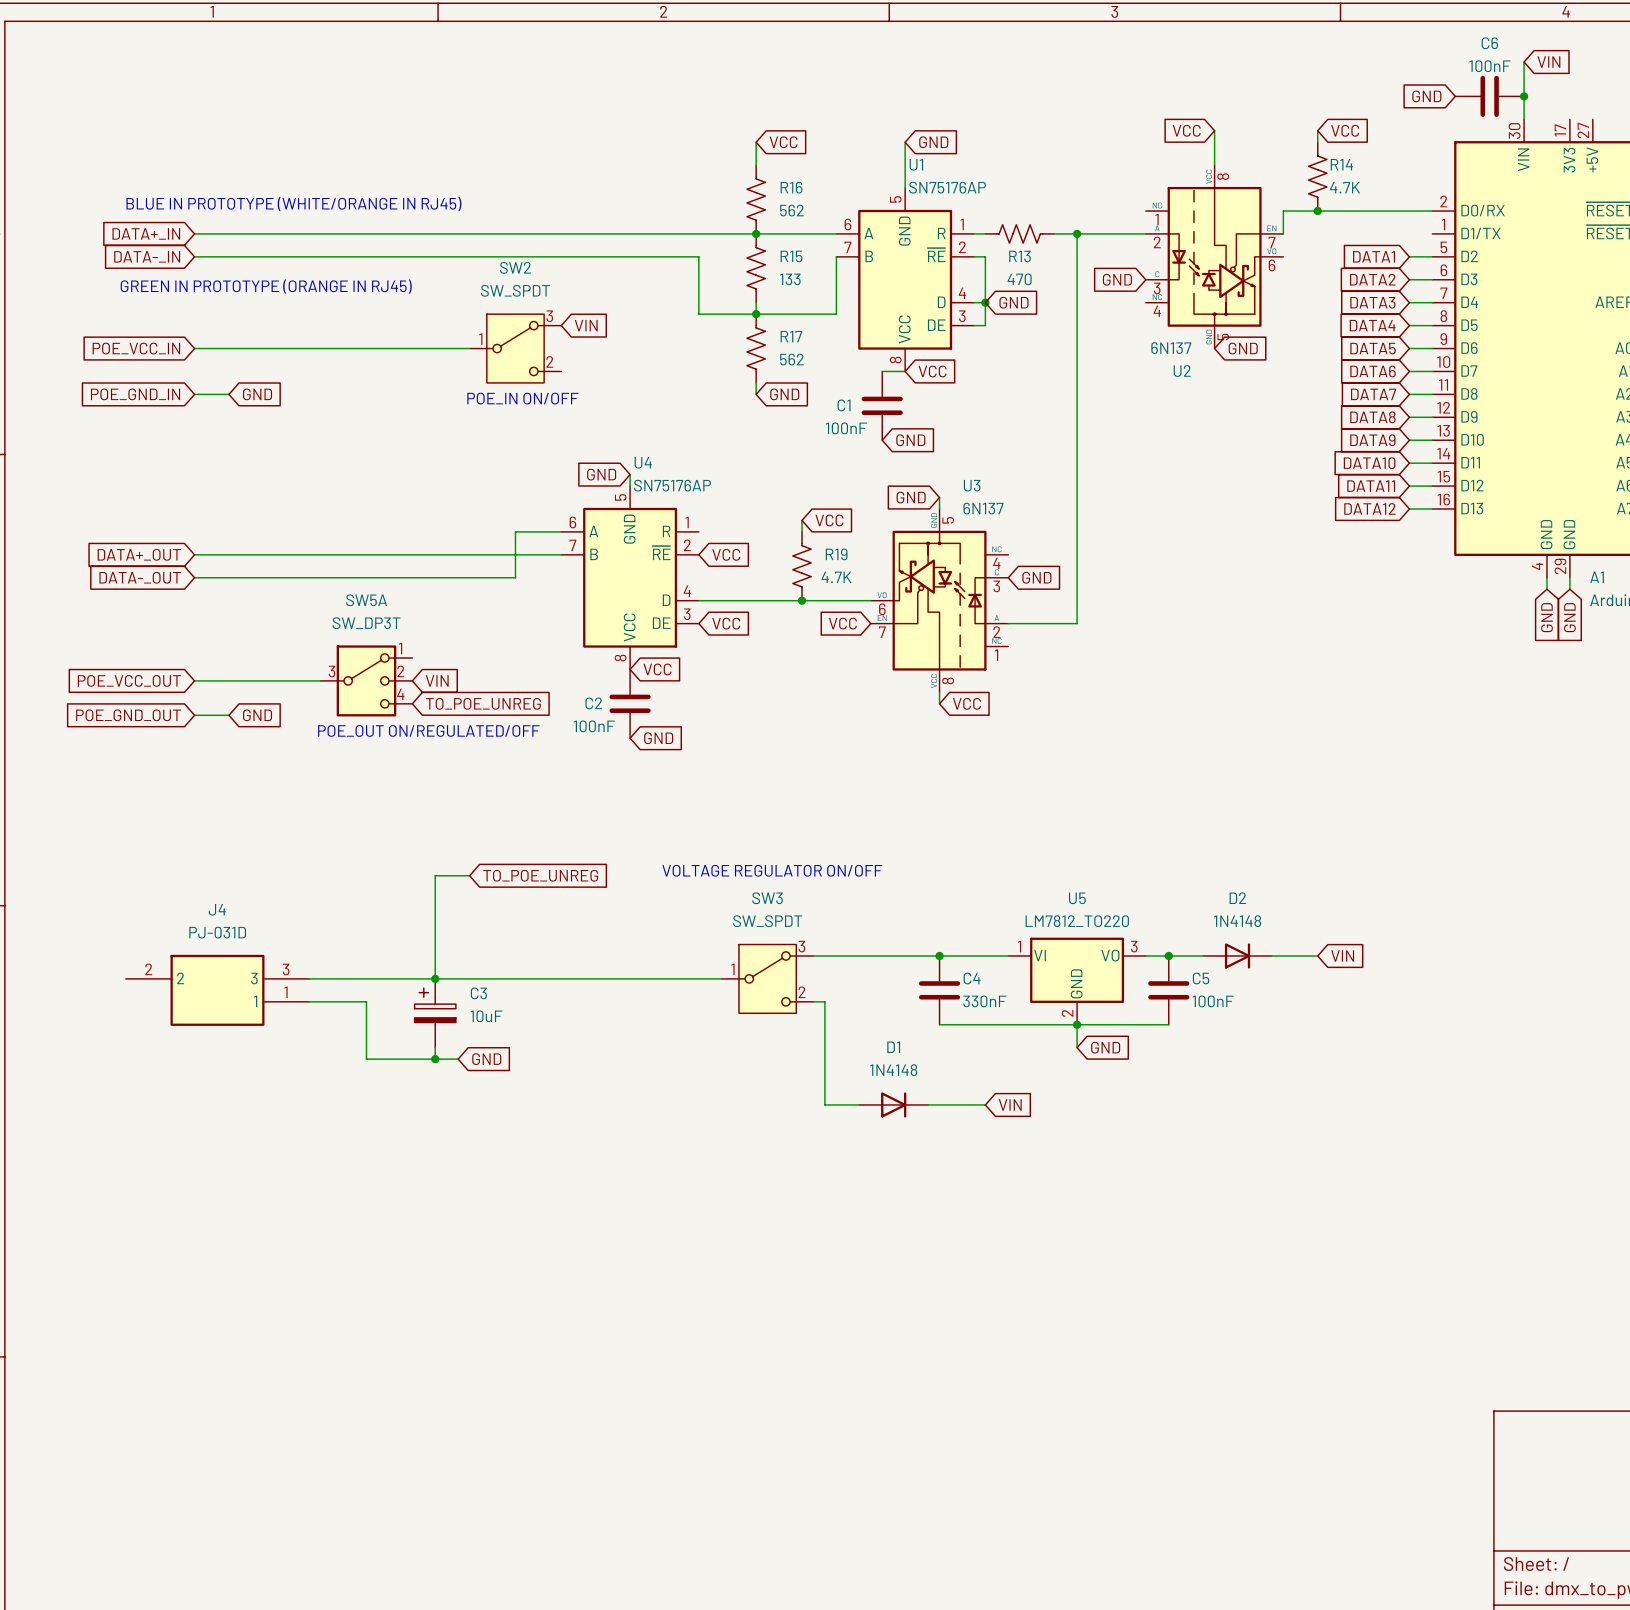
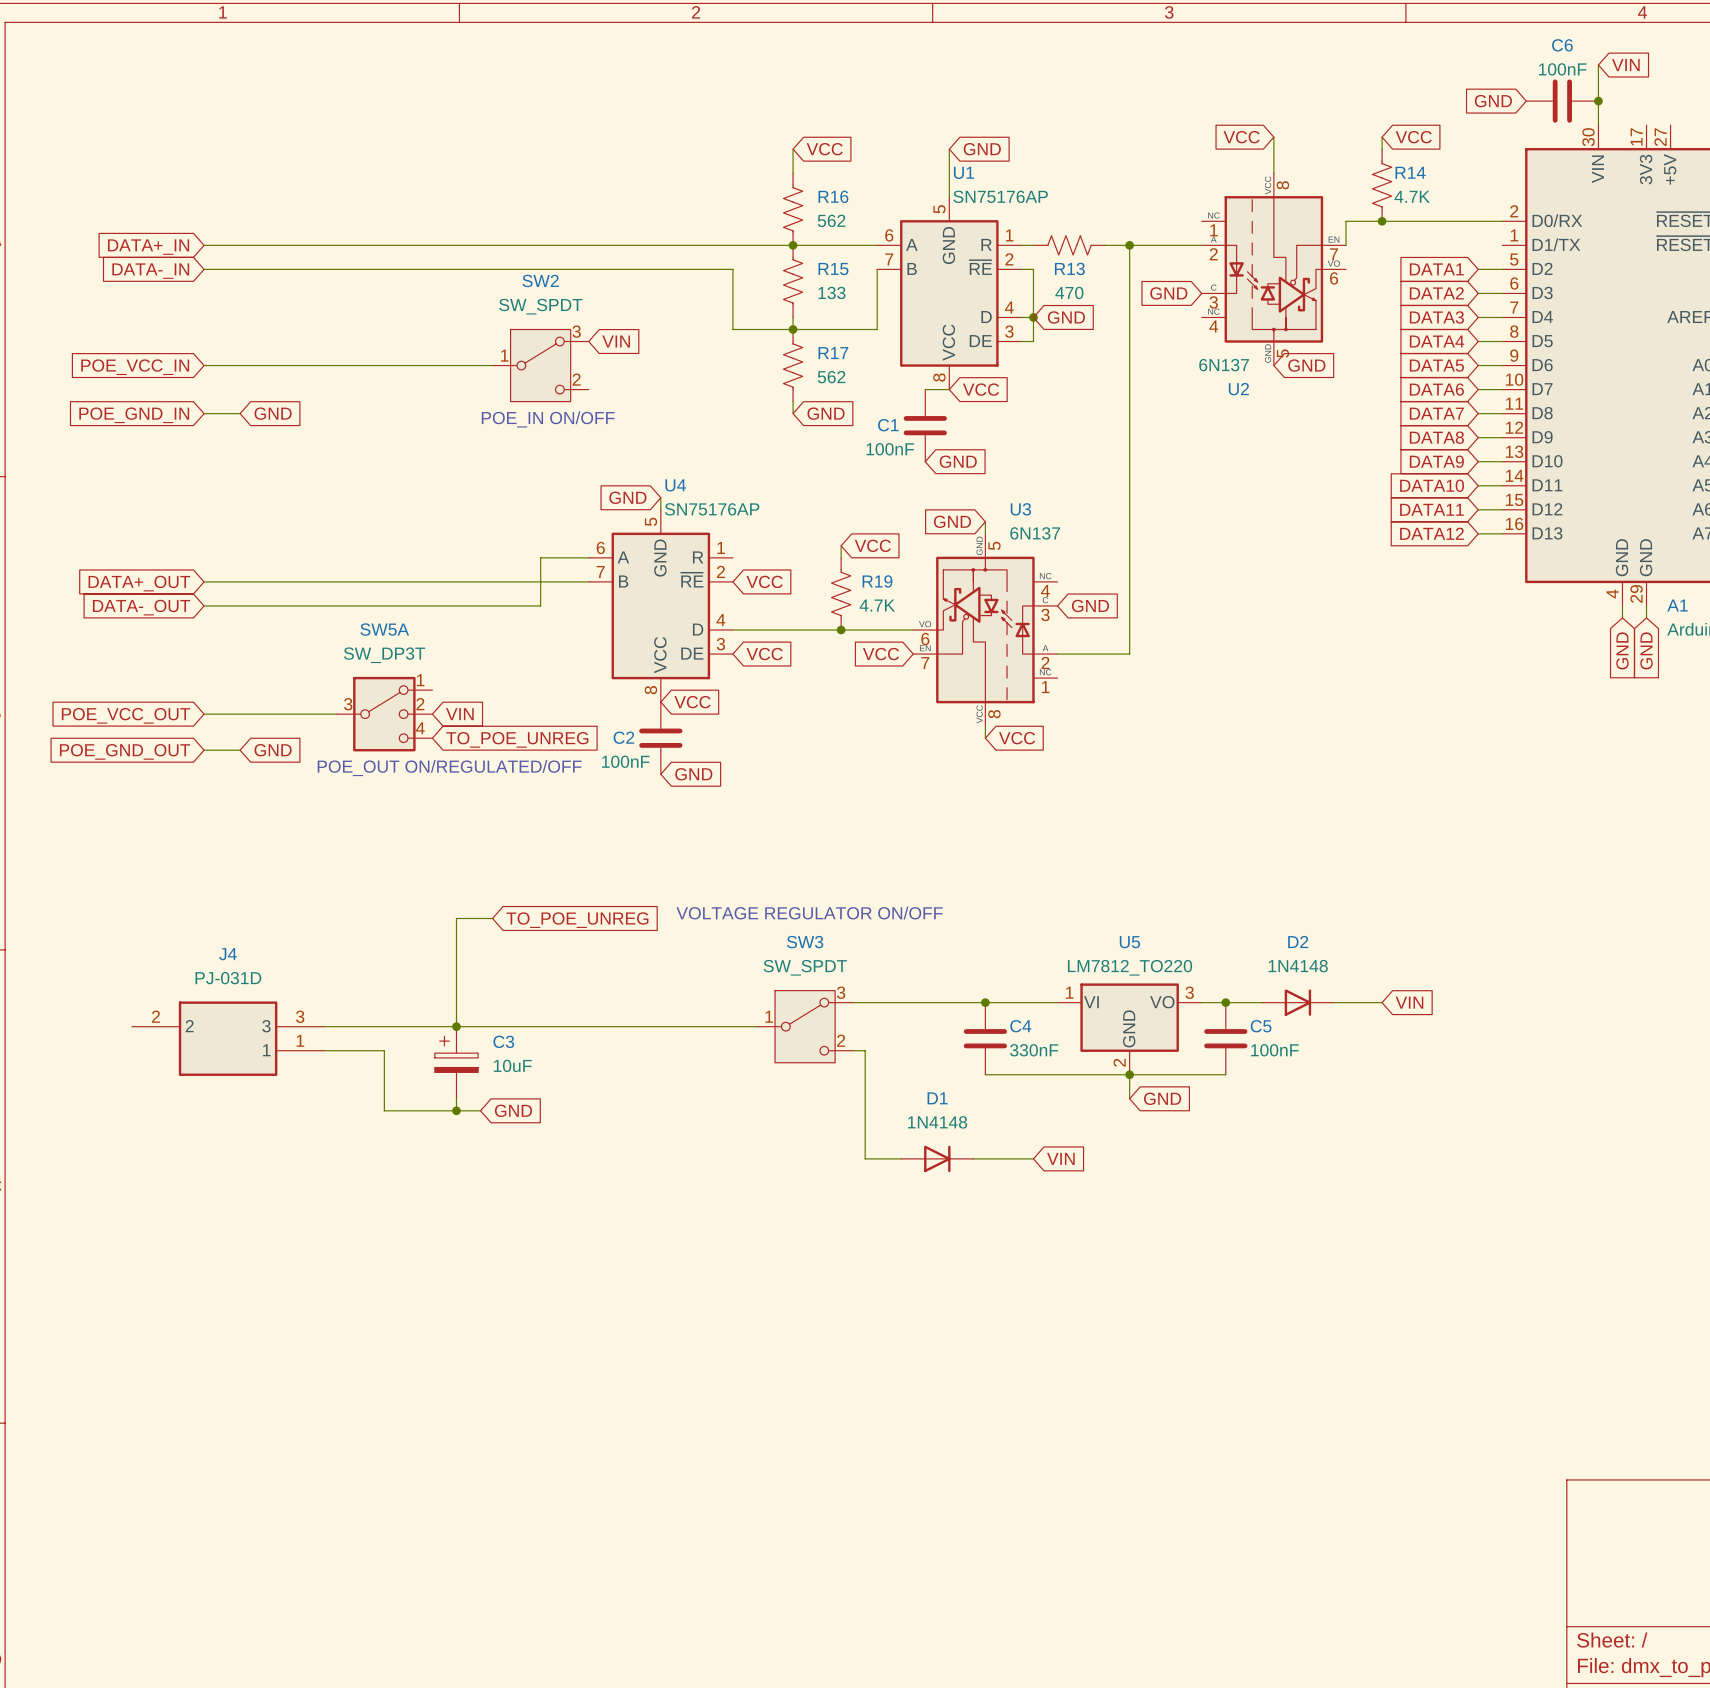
text: BLUE IN PROTOTYPE (WHITE/ORANGE IN RJ45) (293, 204) -> none
text: GREEN IN PROTOTYPE (ORANGE IN RJ45) (266, 286) -> none

